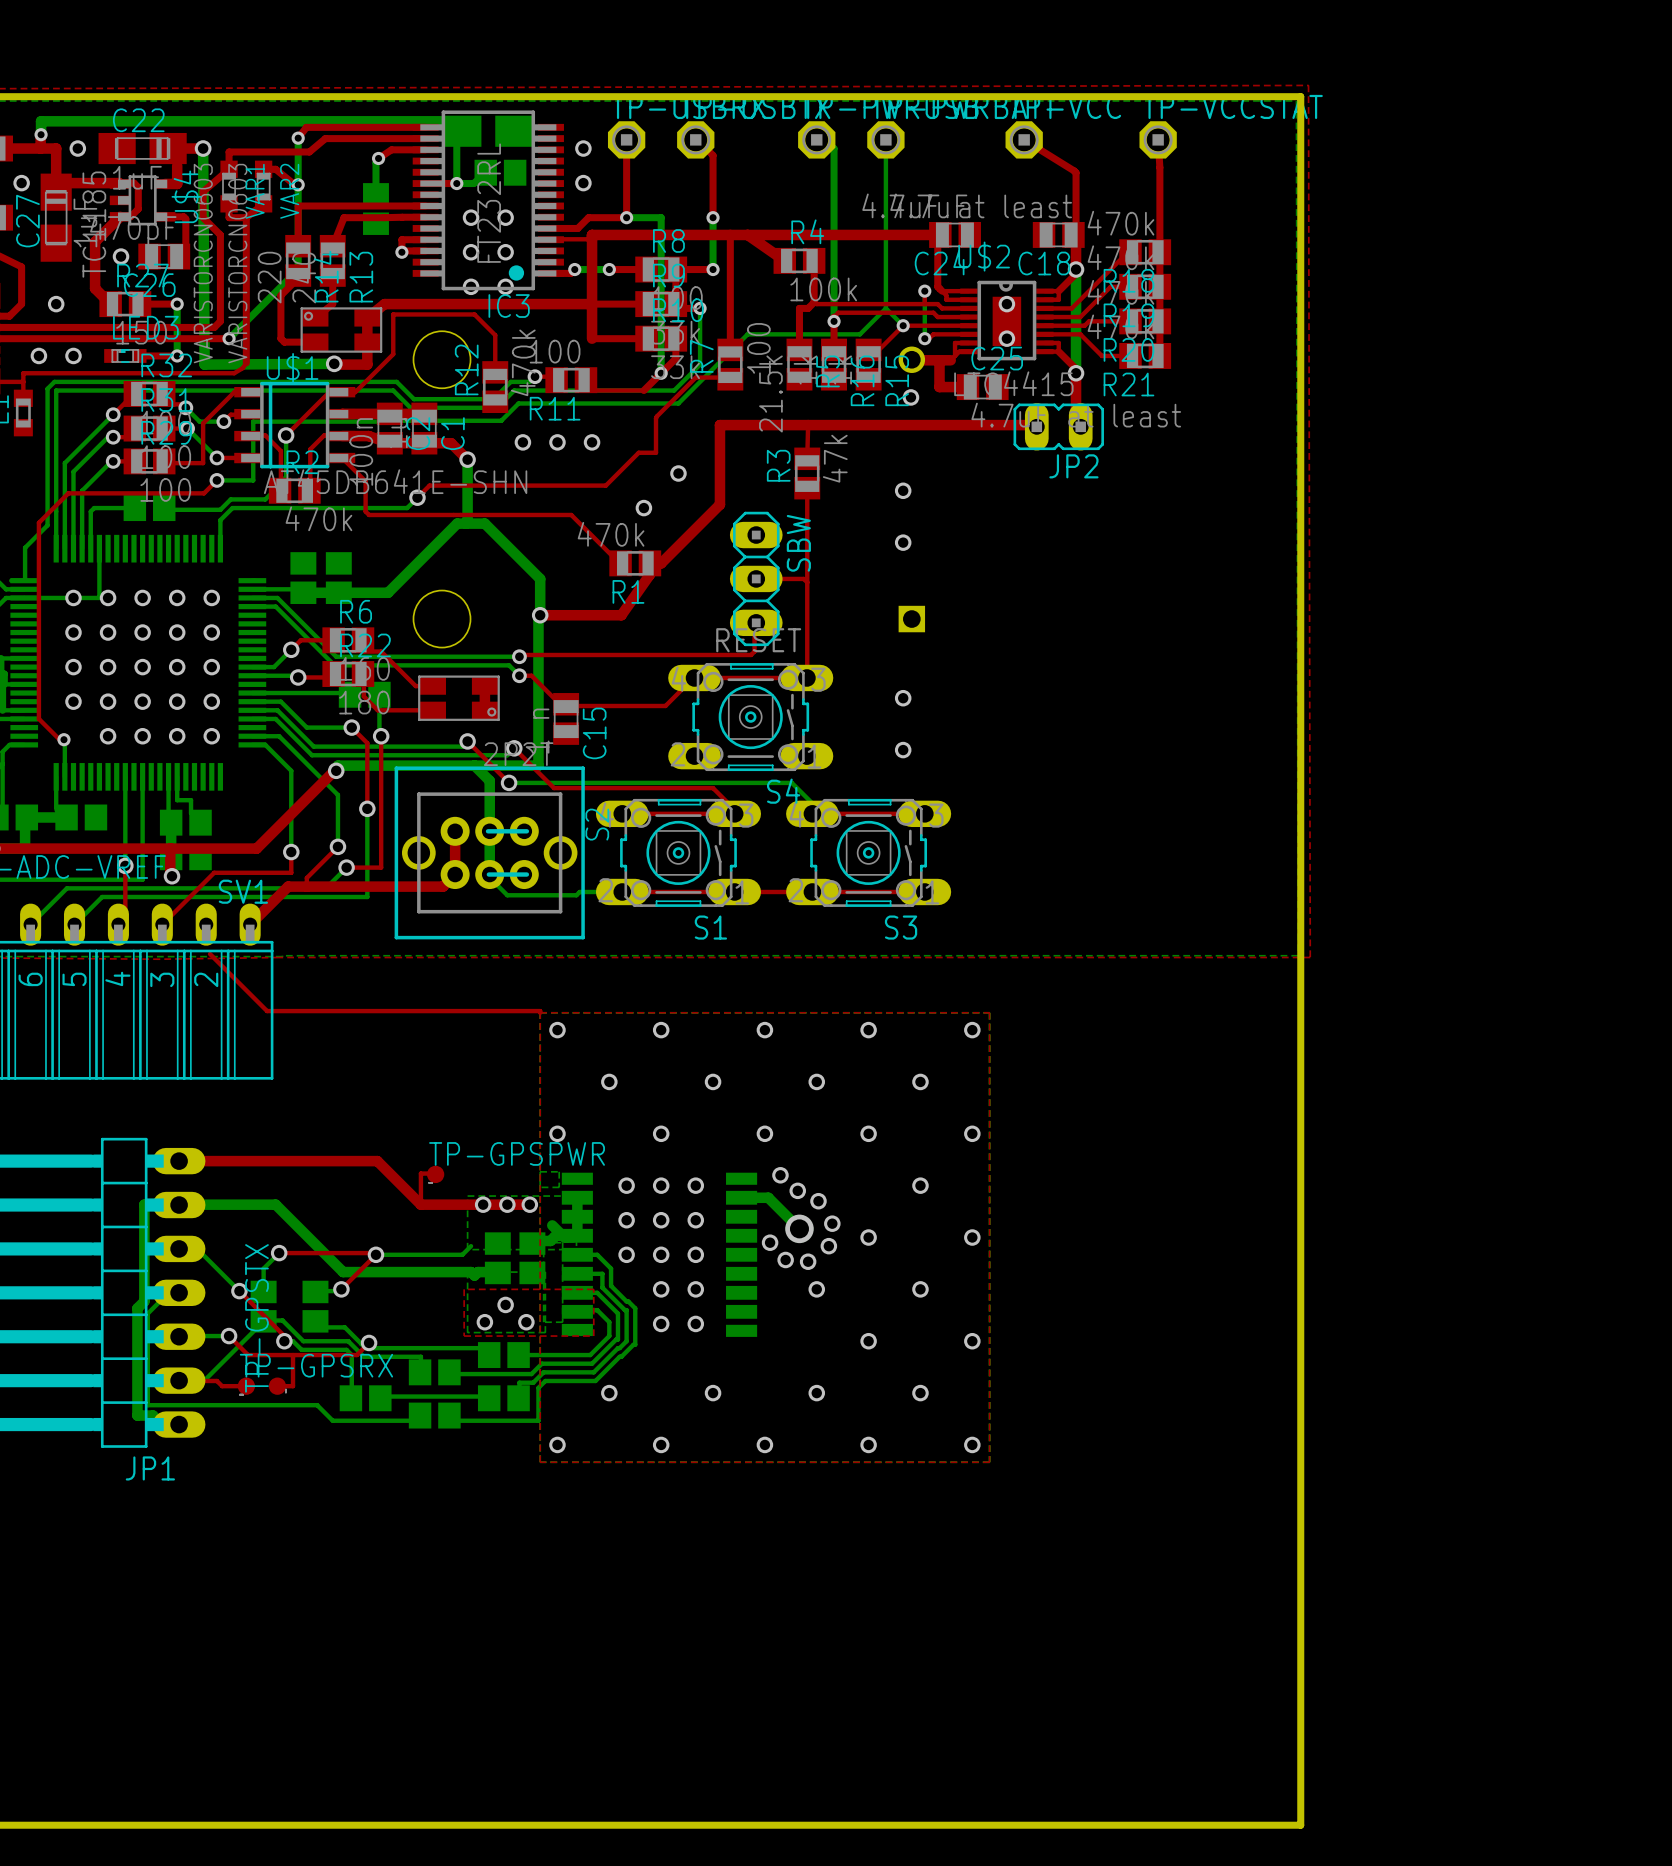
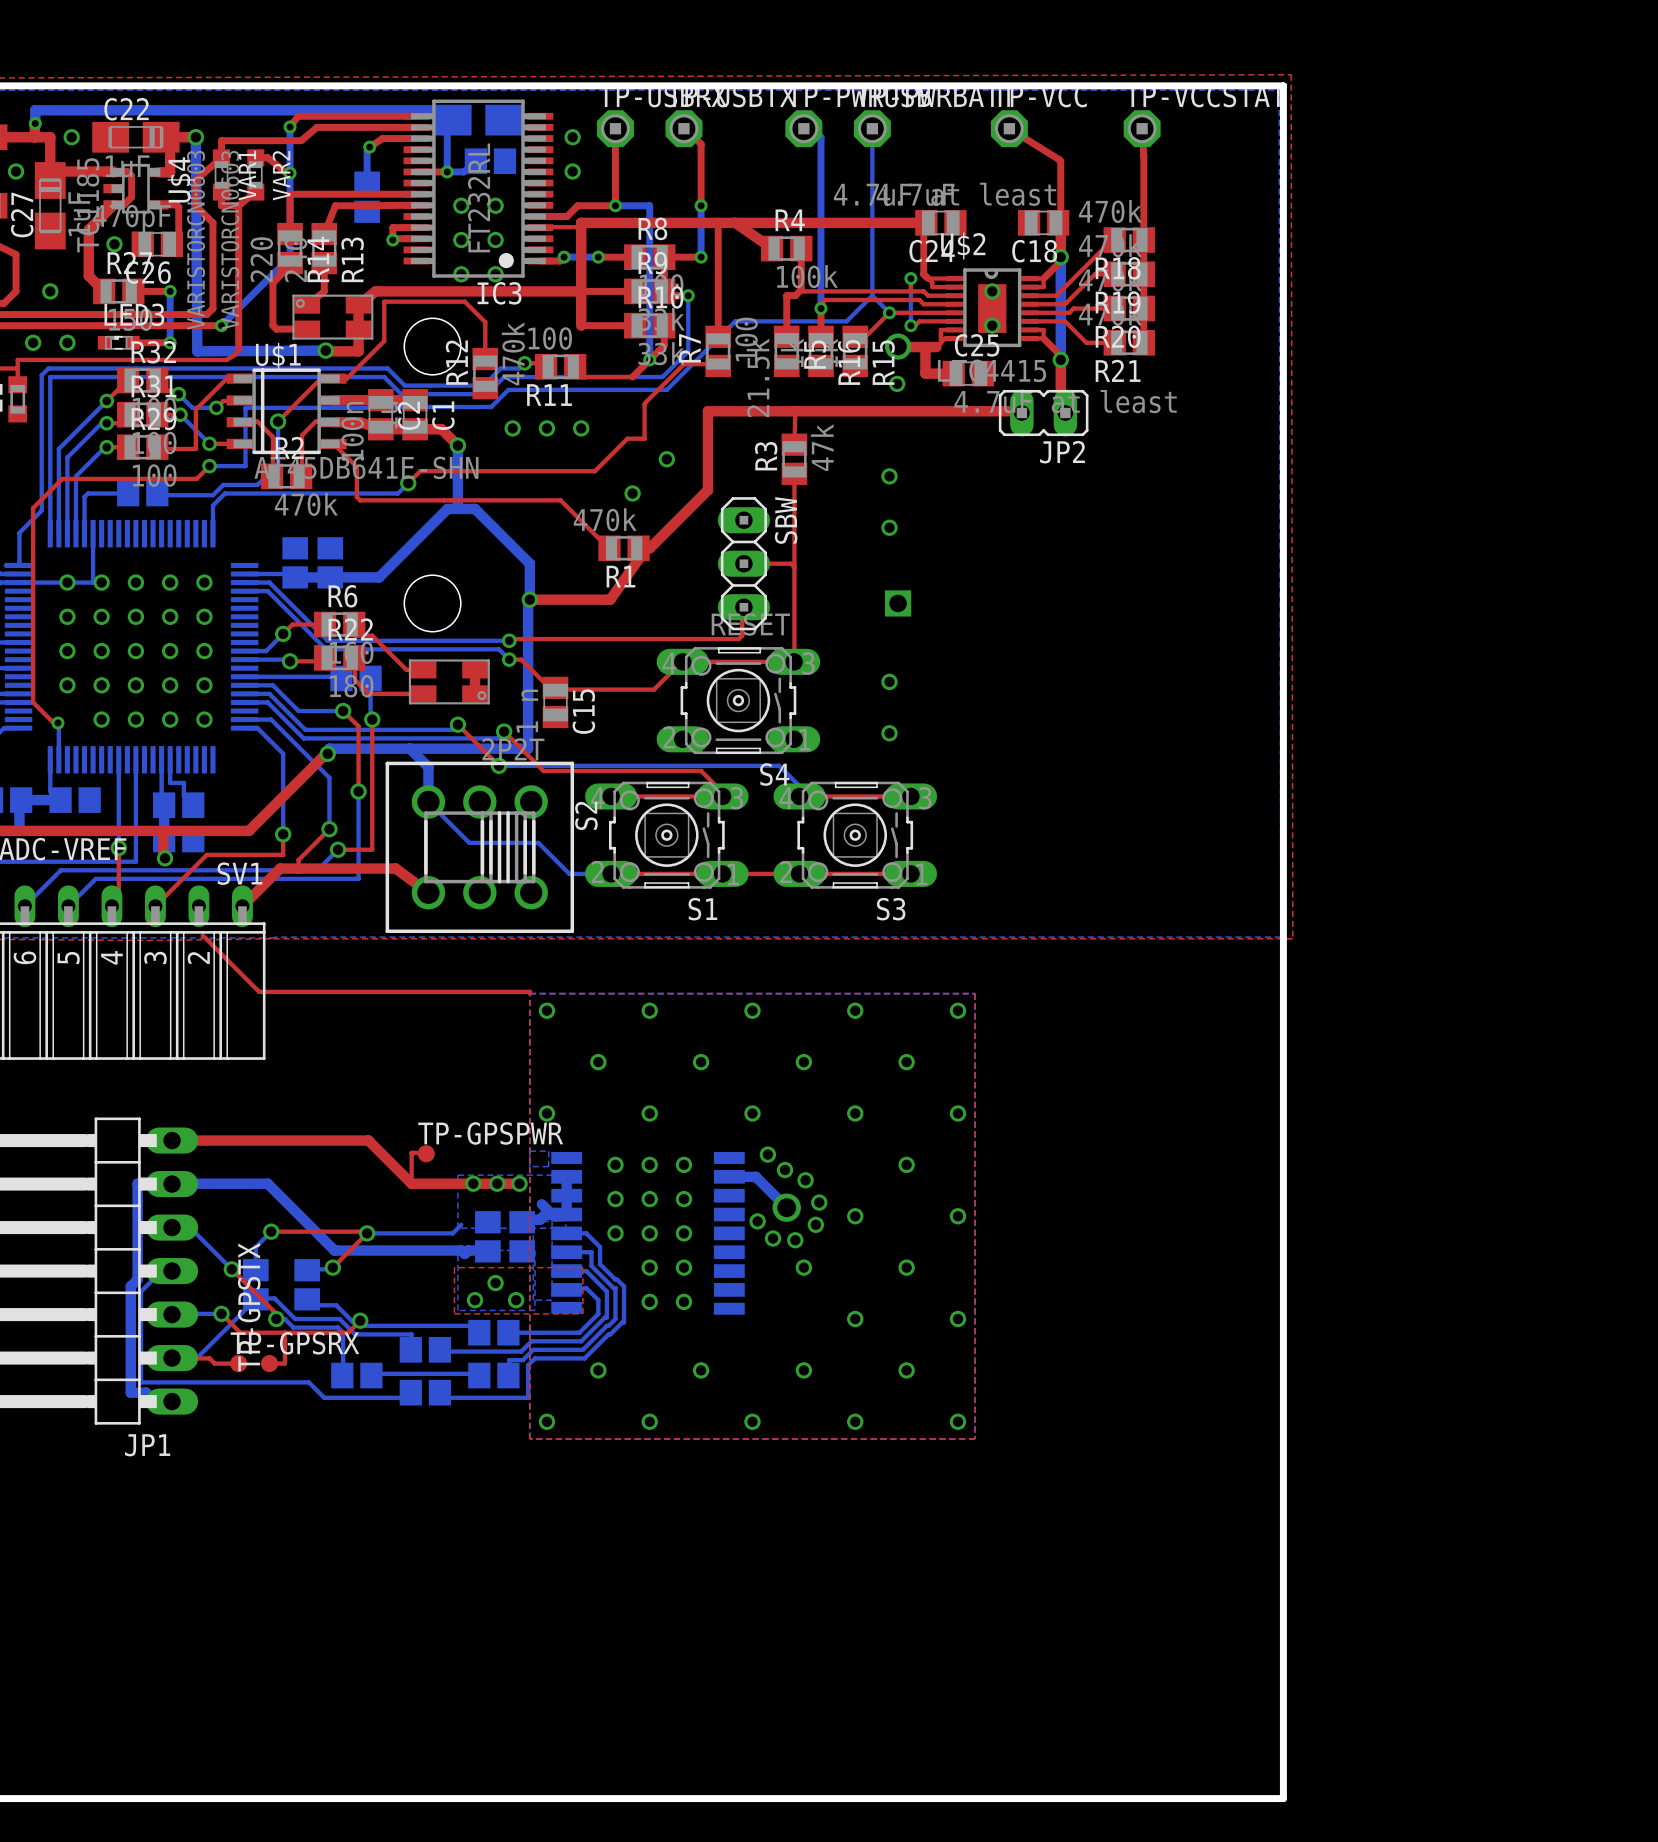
bottom track: (474, 765) (489, 780) (489, 874) (491, 879) (507, 895) (576, 895) (580, 891) -> (409, 748) (428, 767) (428, 801) (469, 842) (538, 842) (569, 873)
S2 footprint: [394, 766, 585, 940] -> [385, 761, 575, 934]
top track: (455, 831) (455, 874) (443, 886) (404, 886) -> (428, 892) (395, 868)

